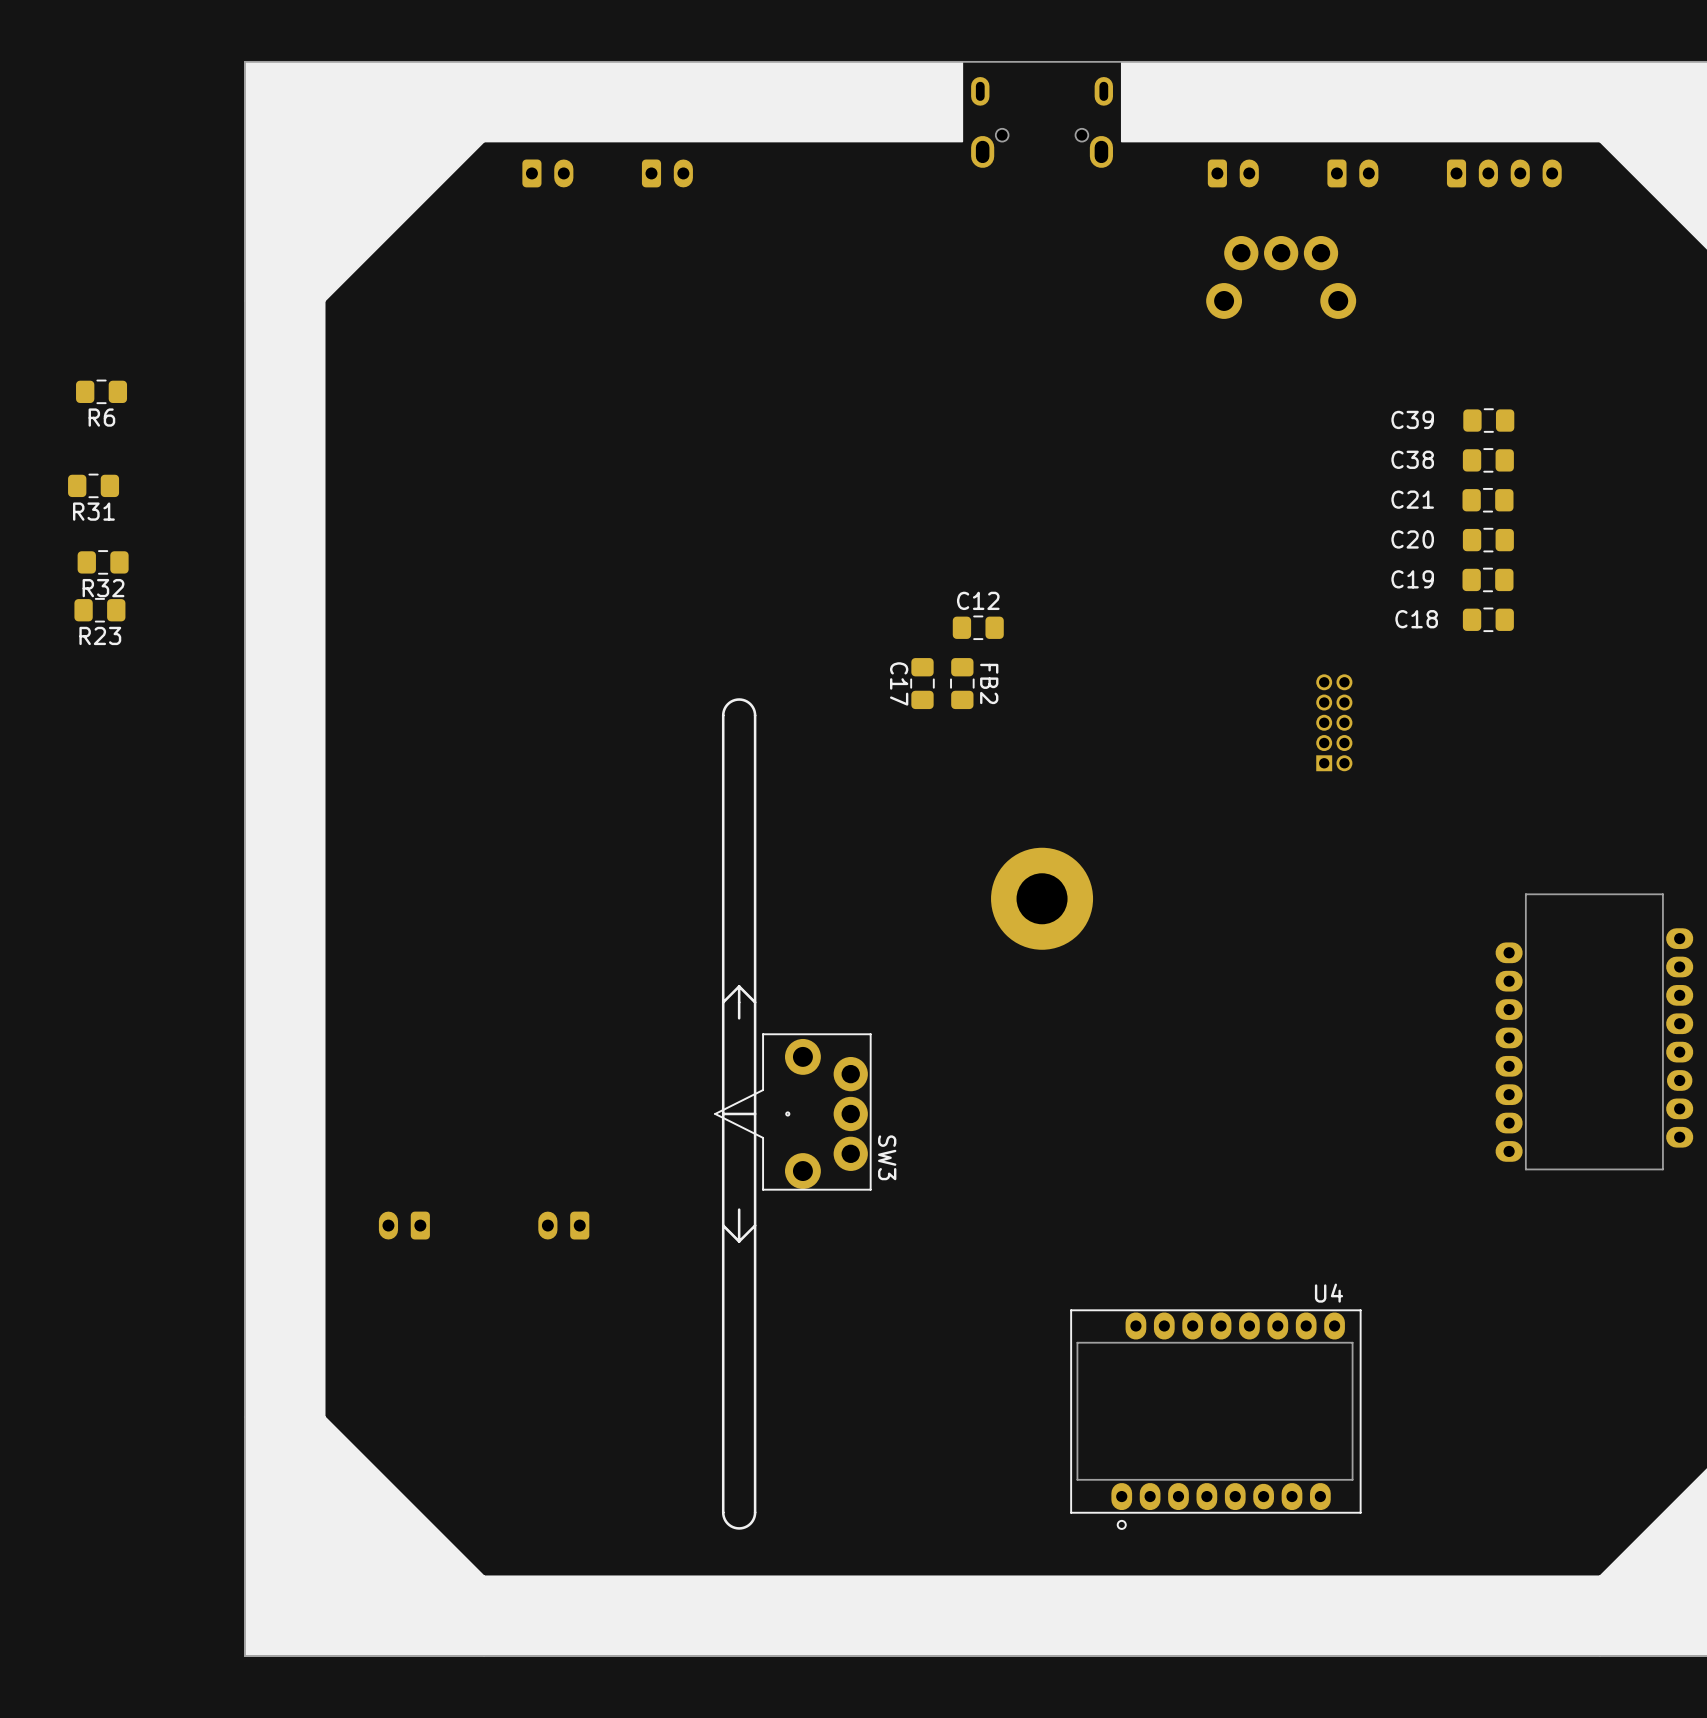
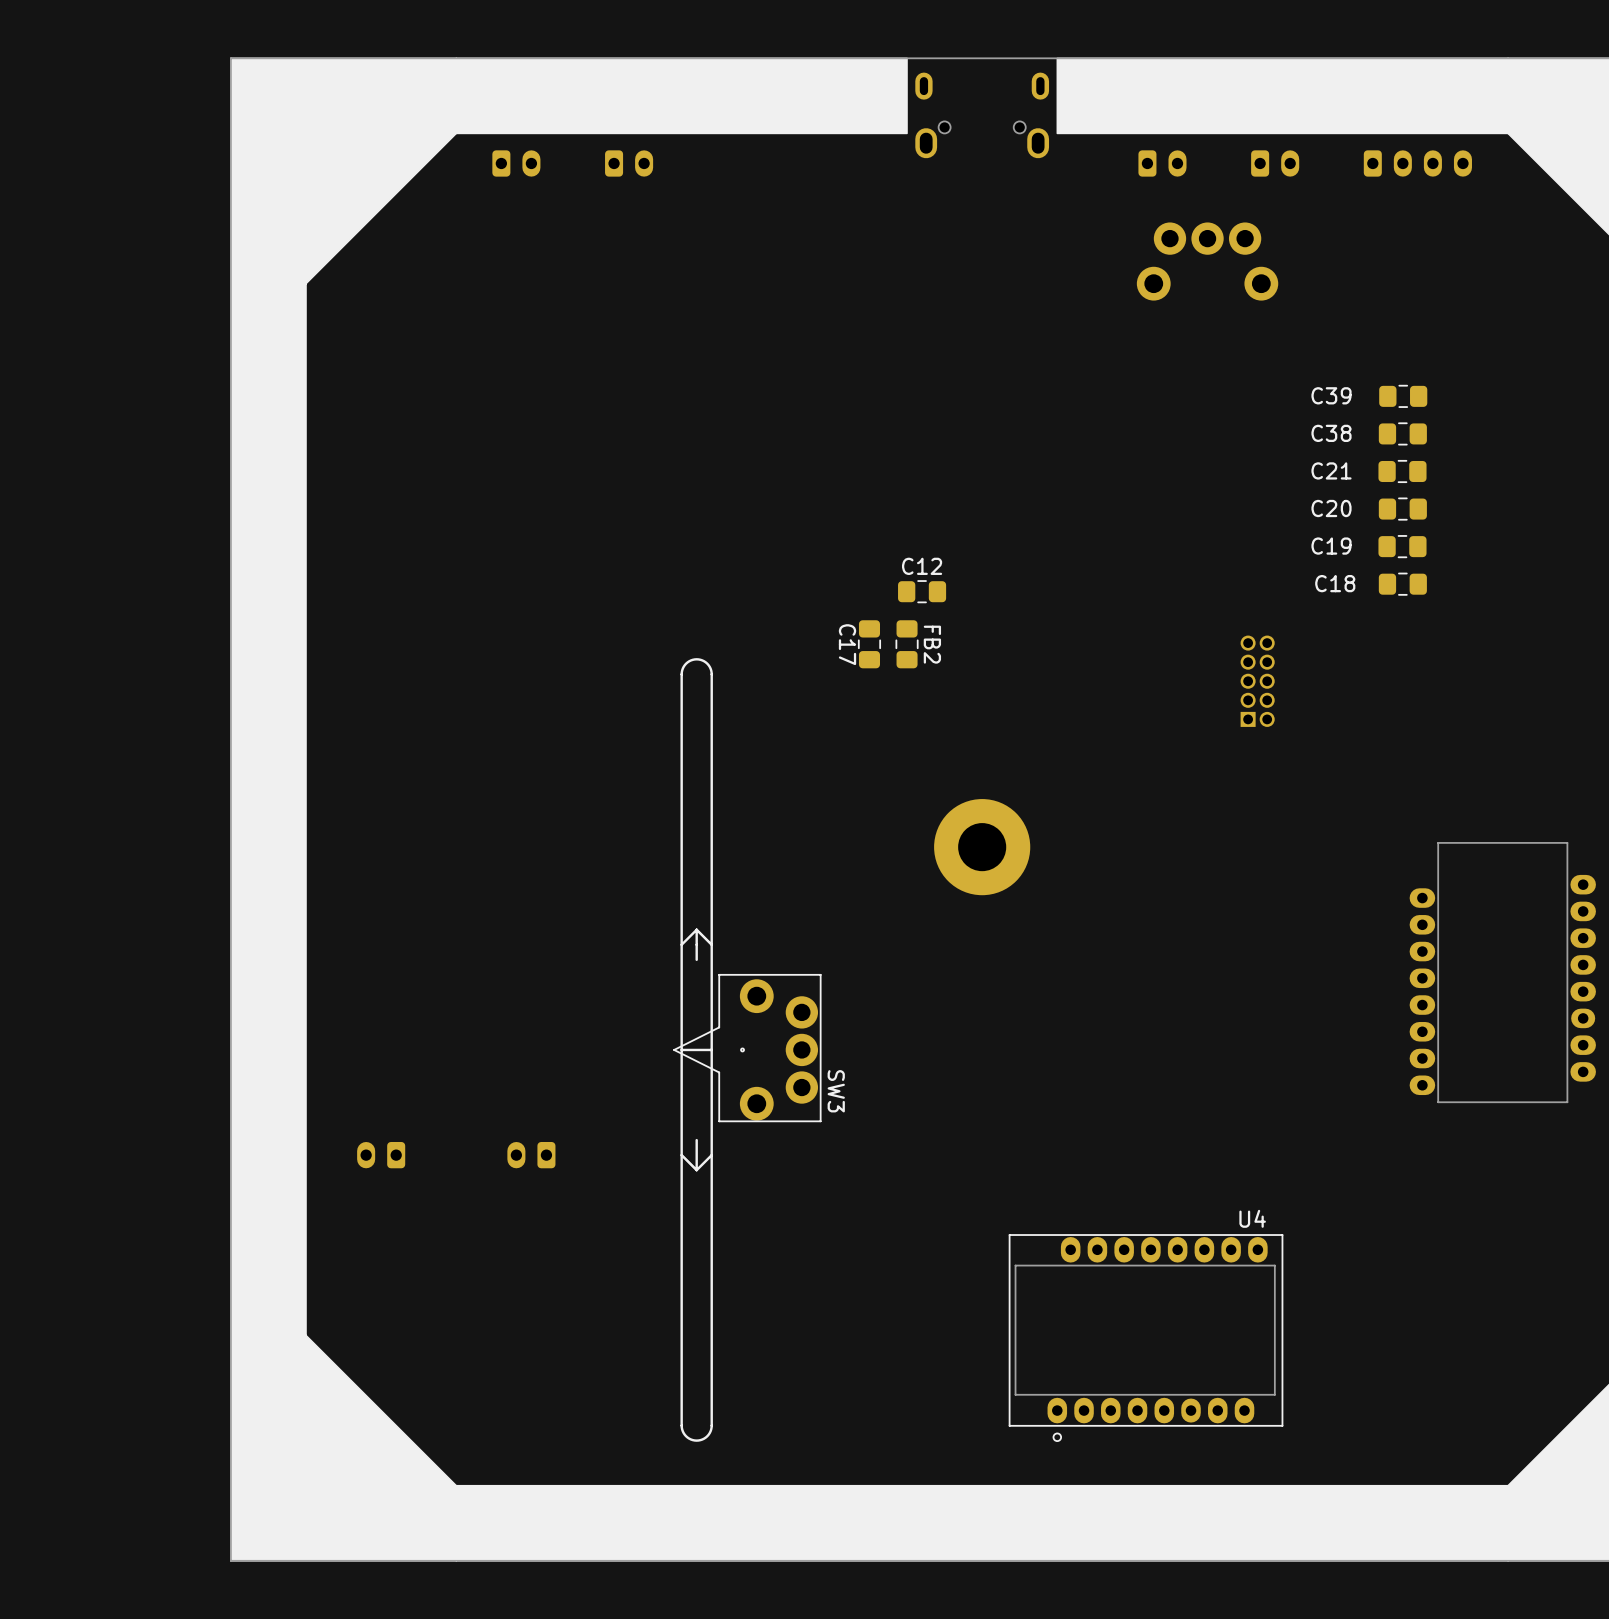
R6: (101, 391) -> none
R31: (93, 485) -> none
R32: (103, 562) -> none
R23: (99, 610) -> none

